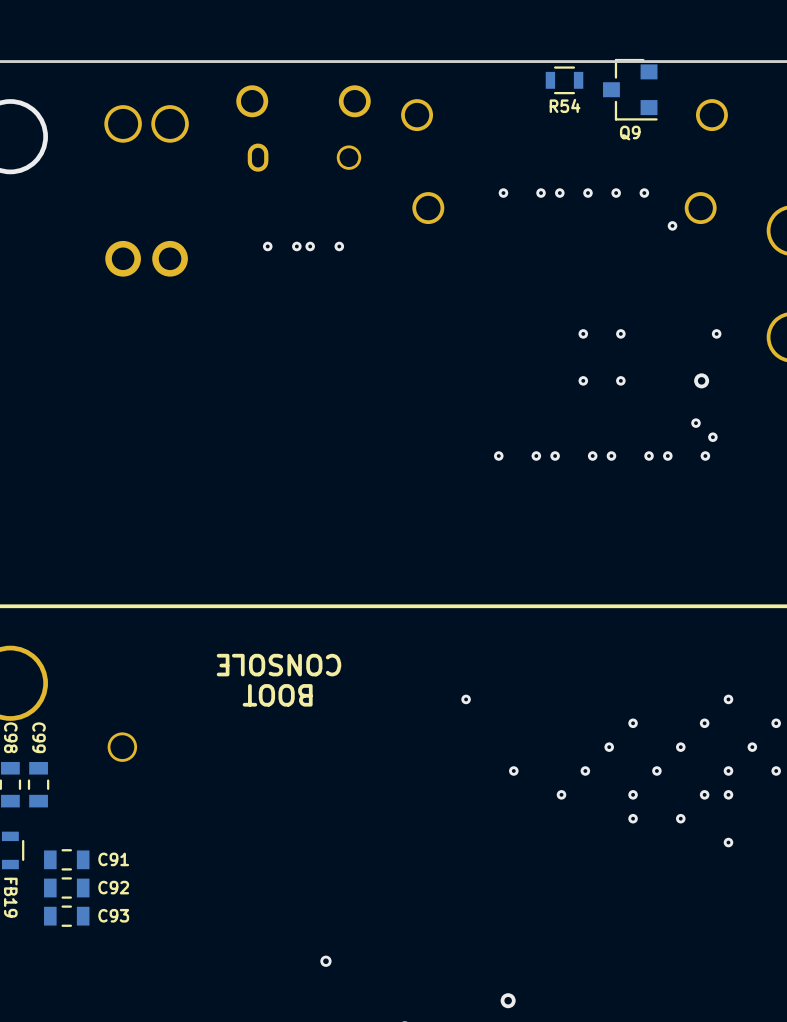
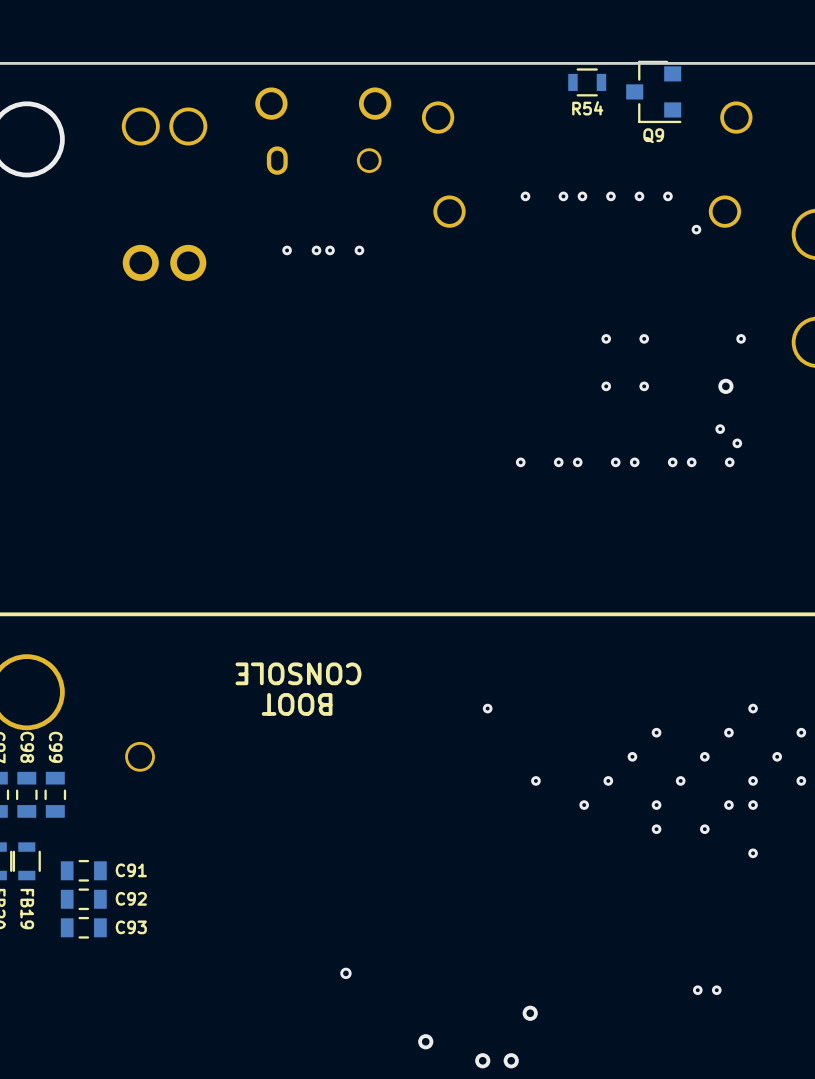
via: none -> (697, 990)
via: none -> (716, 990)

